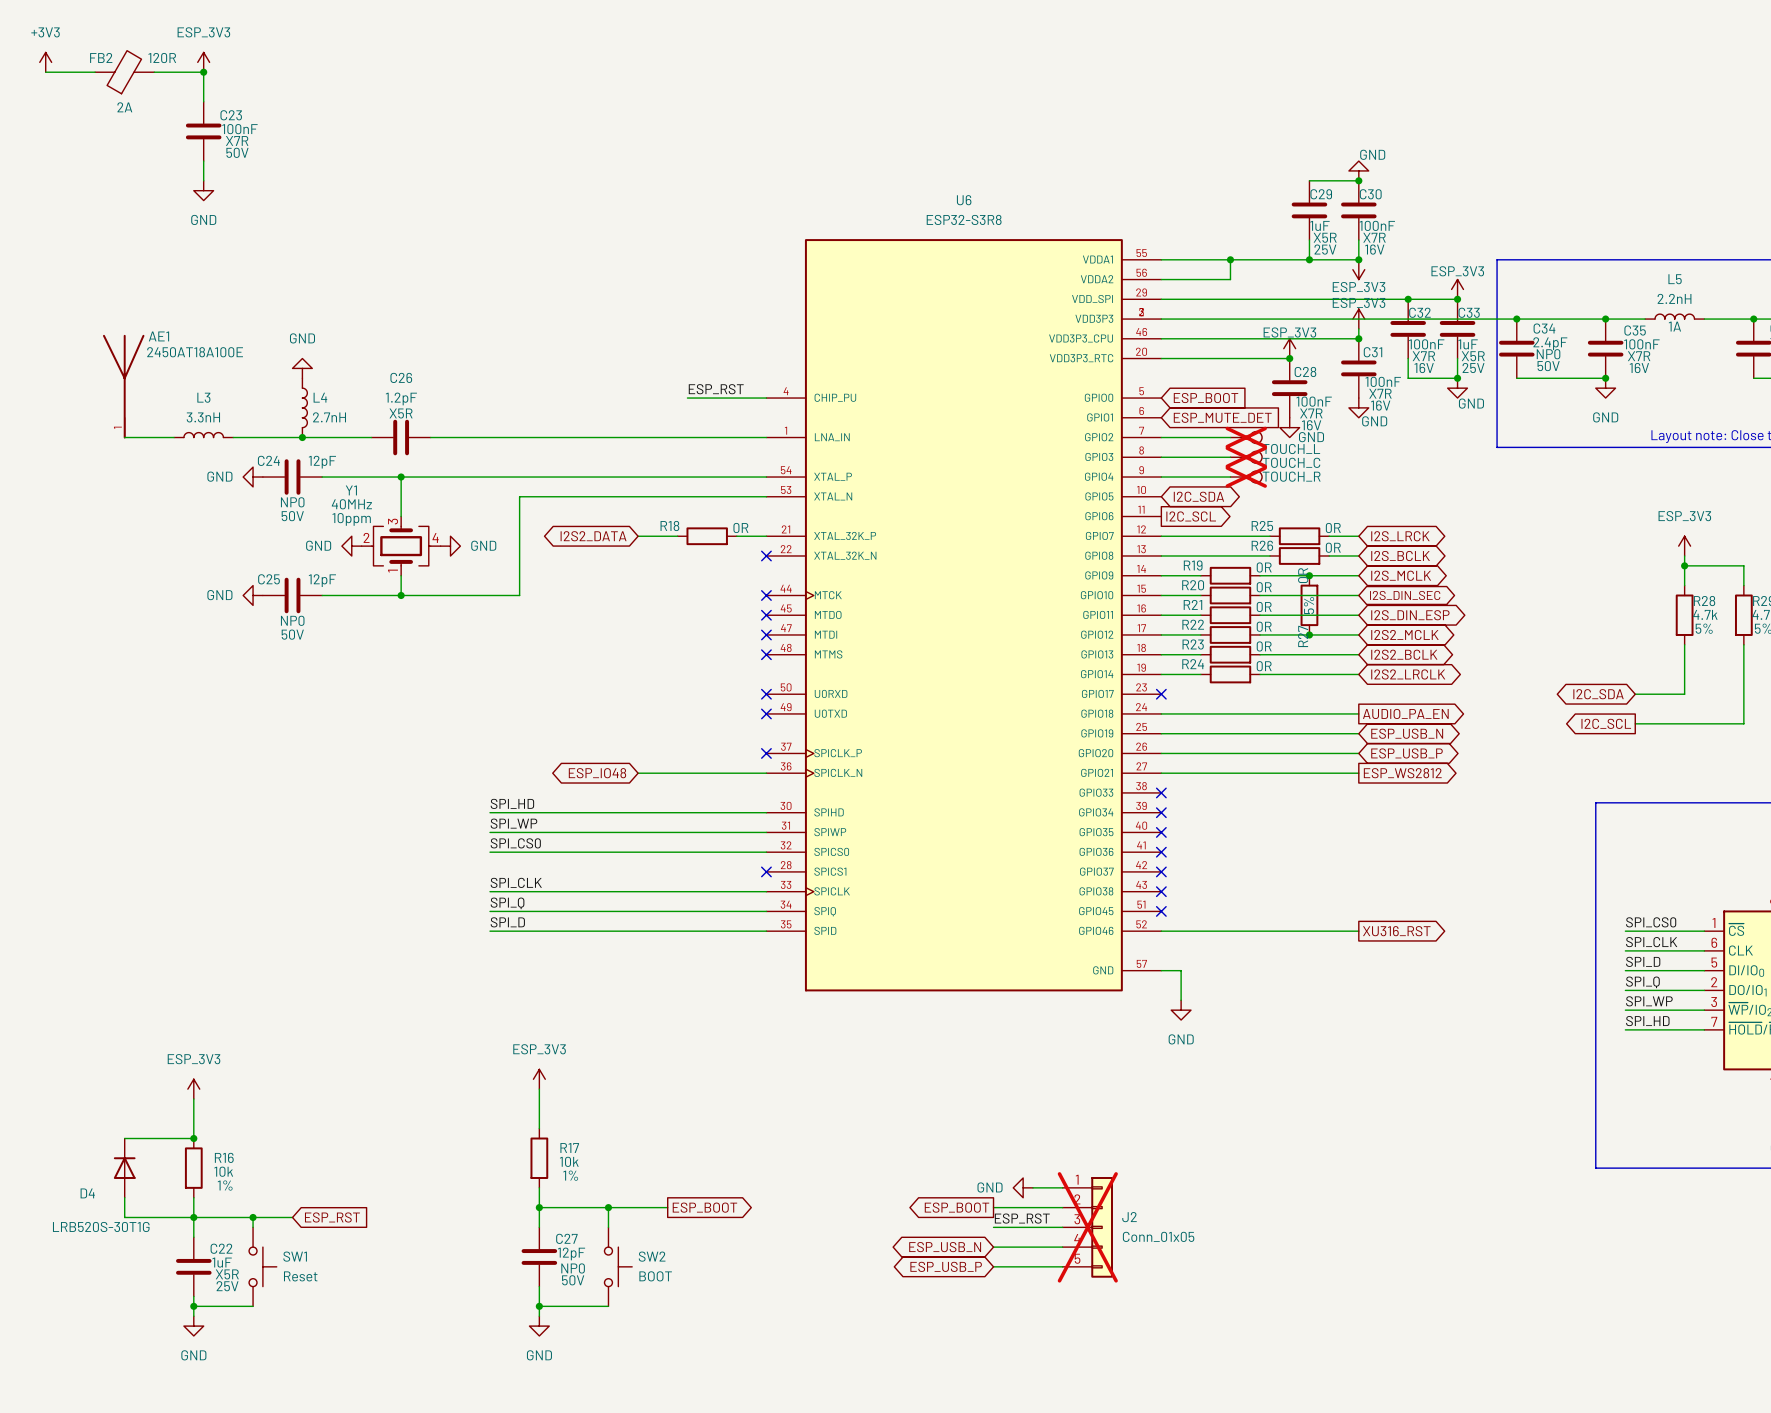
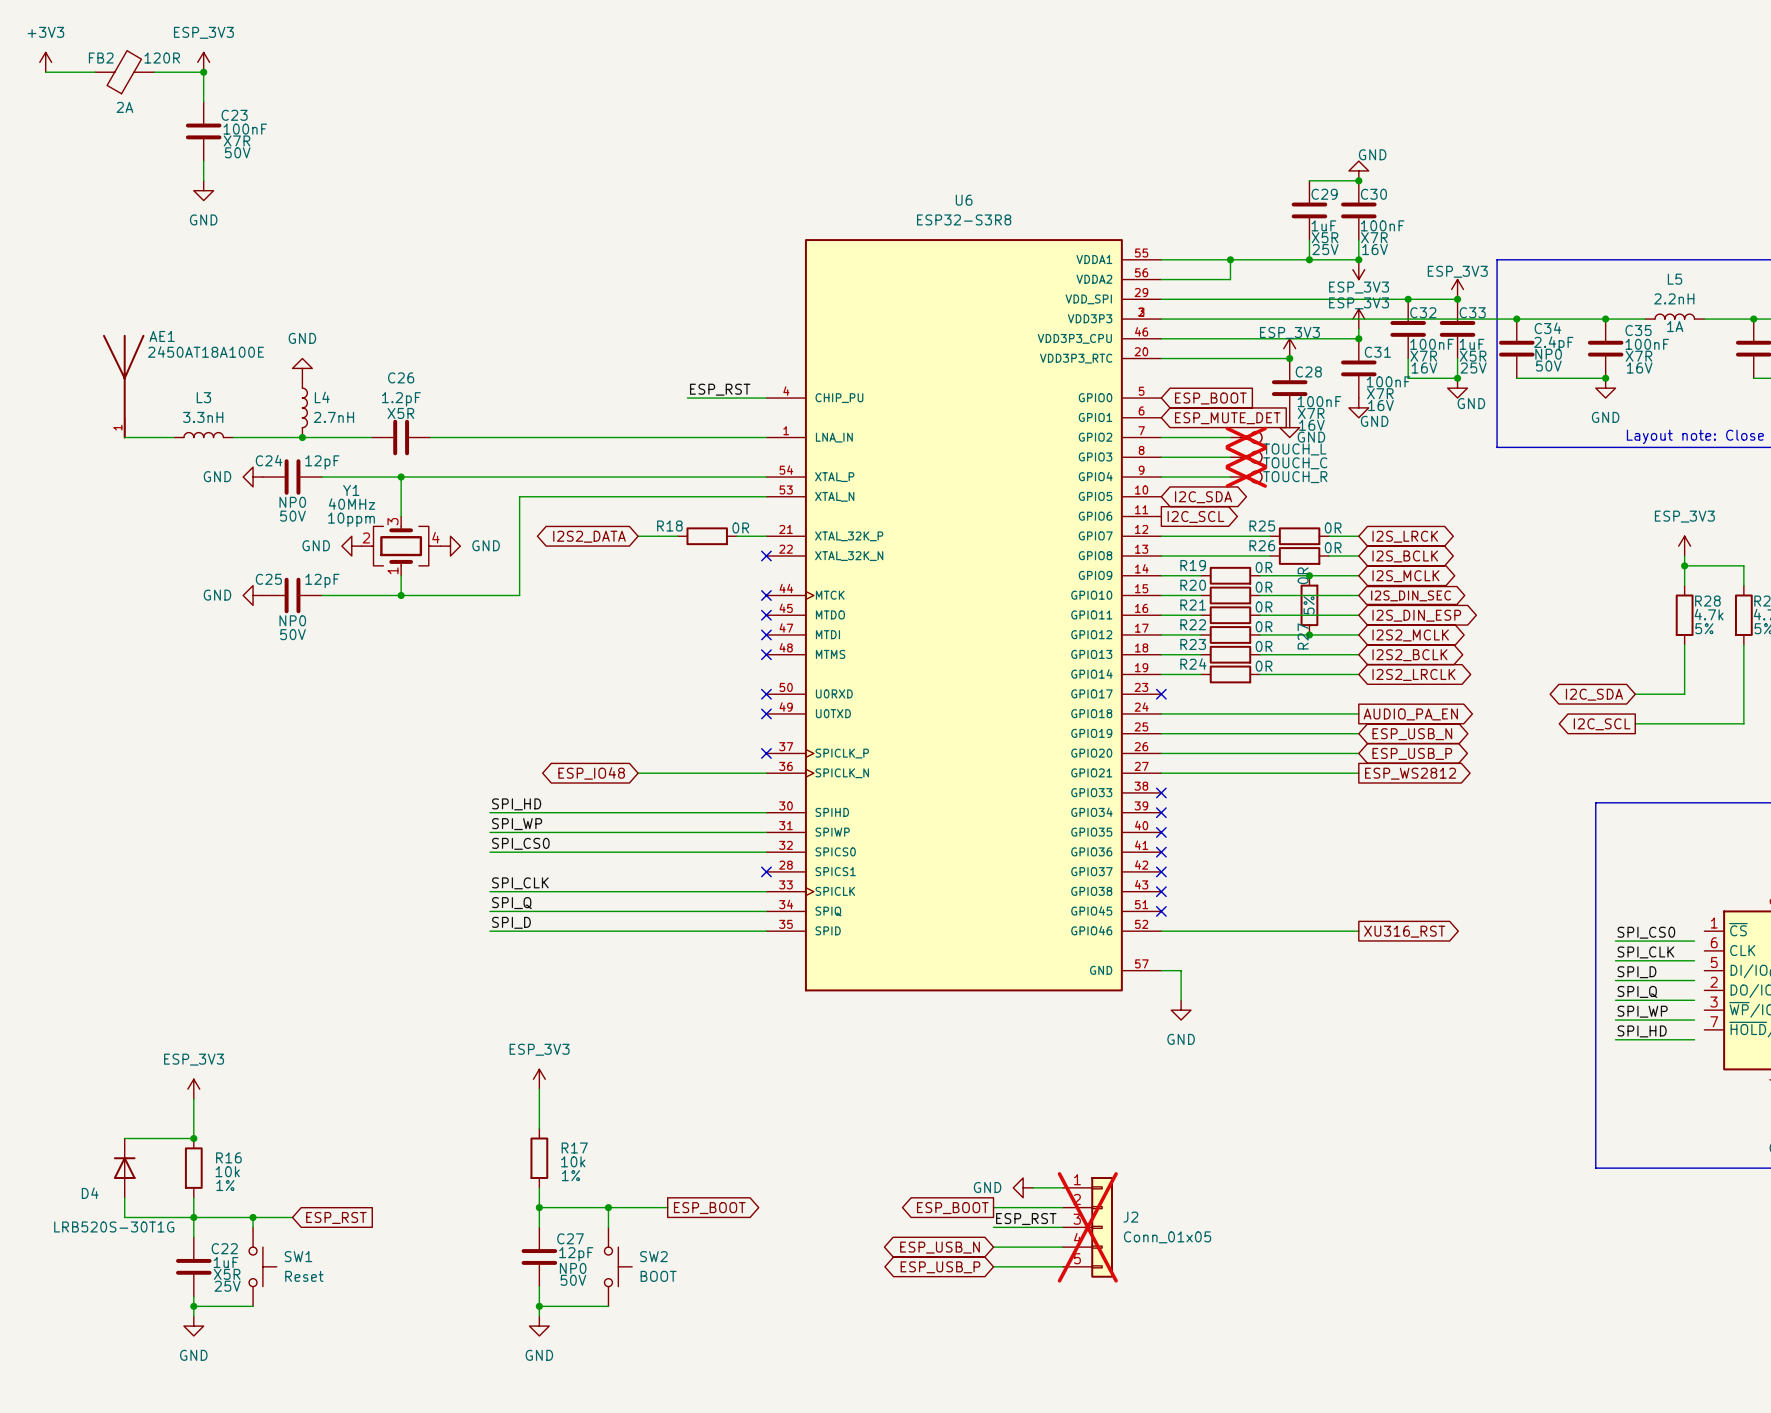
label position: SPI_CS0 (1651, 922) -> SPI_CS0 (1646, 932)
wire: (1625, 931) (1704, 931) -> (1615, 941) (1694, 941)
label position: SPI_CLK (1651, 942) -> SPI_CLK (1645, 952)
wire: (1625, 950) (1704, 950) -> (1615, 960) (1694, 960)
label position: SPI_D (1643, 961) -> SPI_D (1636, 972)
wire: (1625, 970) (1704, 970) -> (1615, 980) (1694, 980)
label position: SPI_Q (1642, 982) -> SPI_Q (1637, 991)
wire: (1625, 990) (1704, 990) -> (1615, 1000) (1694, 1000)
label position: SPI_WP (1649, 1001) -> SPI_WP (1642, 1011)
wire: (1625, 1010) (1704, 1010) -> (1615, 1020) (1694, 1020)
label position: SPI_HD (1647, 1021) -> SPI_HD (1642, 1031)
wire: (1625, 1029) (1704, 1029) -> (1615, 1039) (1694, 1039)

